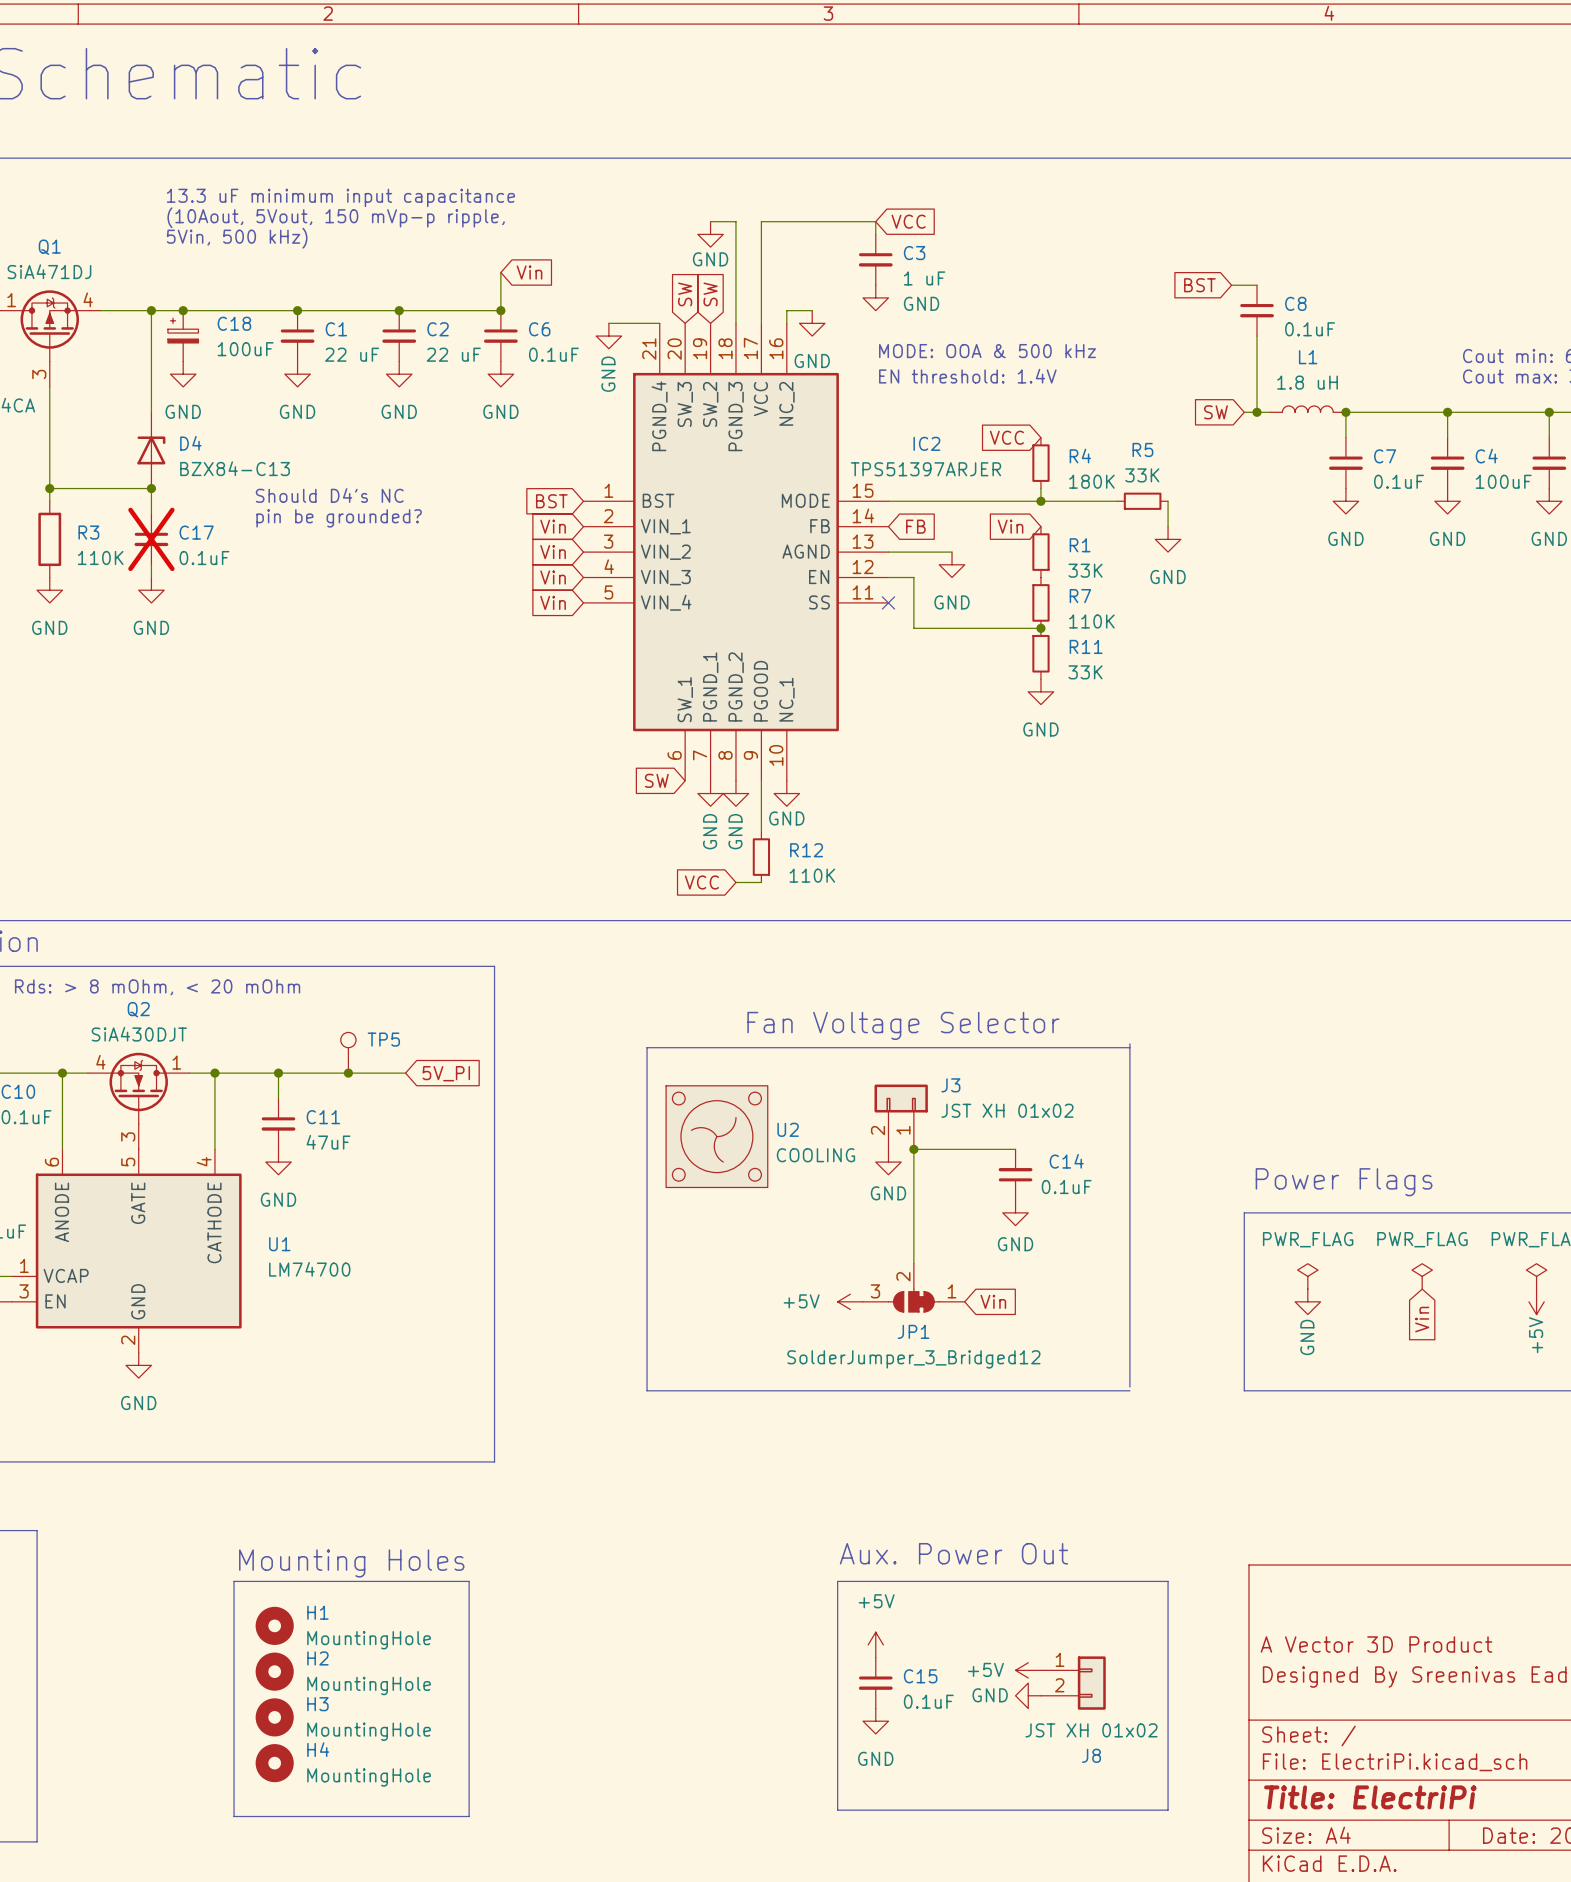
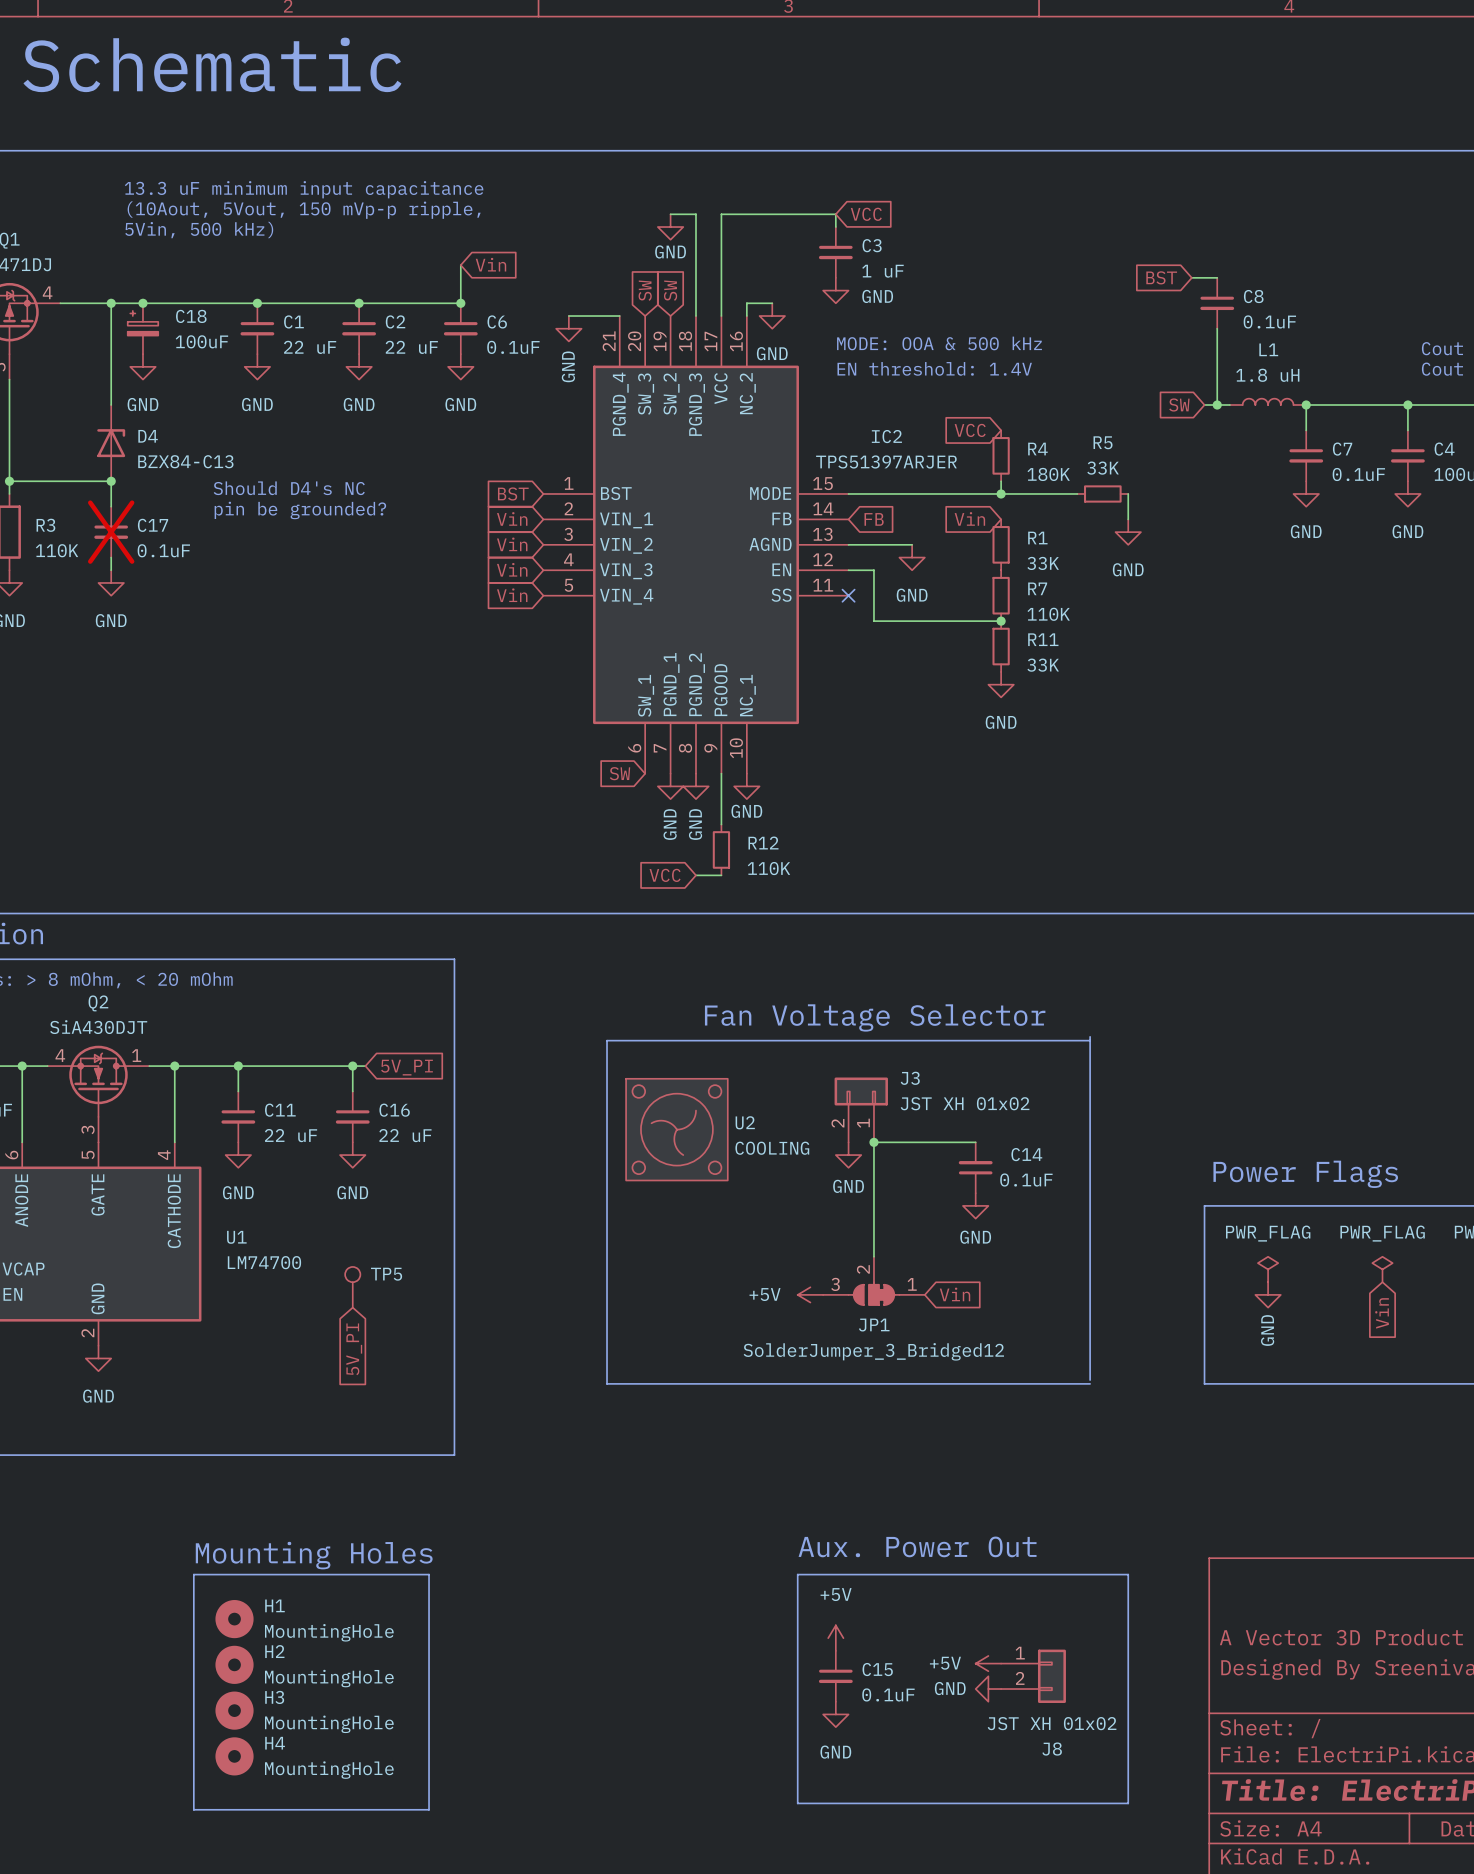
TP5 position: (348, 1052) -> (352, 1287)
junction position: (348, 1073) -> (352, 1066)
wire: none -> (352, 1066) (352, 1091)
C16: none -> 22 uF (352, 1116)
C11 value: 47uF (328, 1142) -> 22 uF (291, 1135)
power symbol: none -> GND (352, 1155)
global label: none -> 5V_PI (354, 1349)

